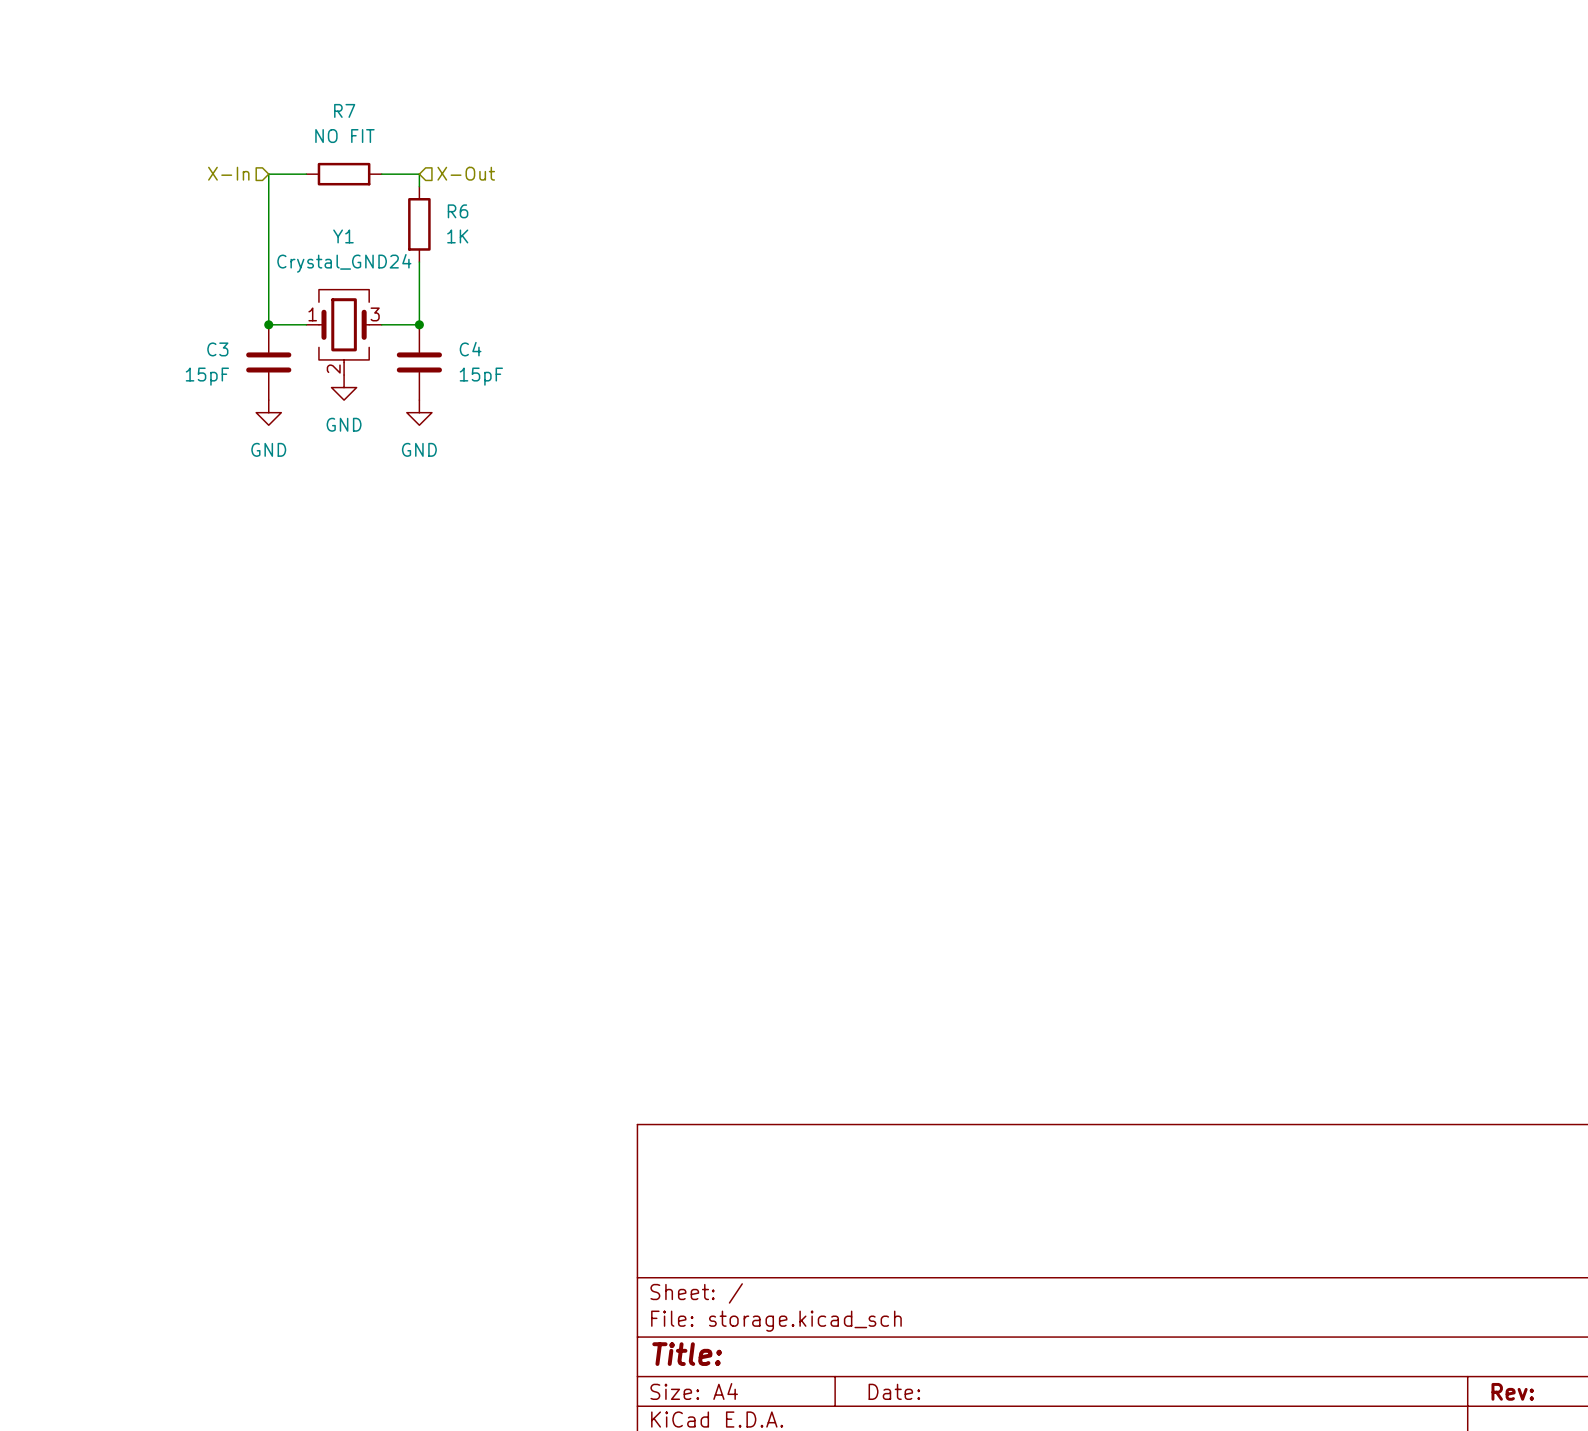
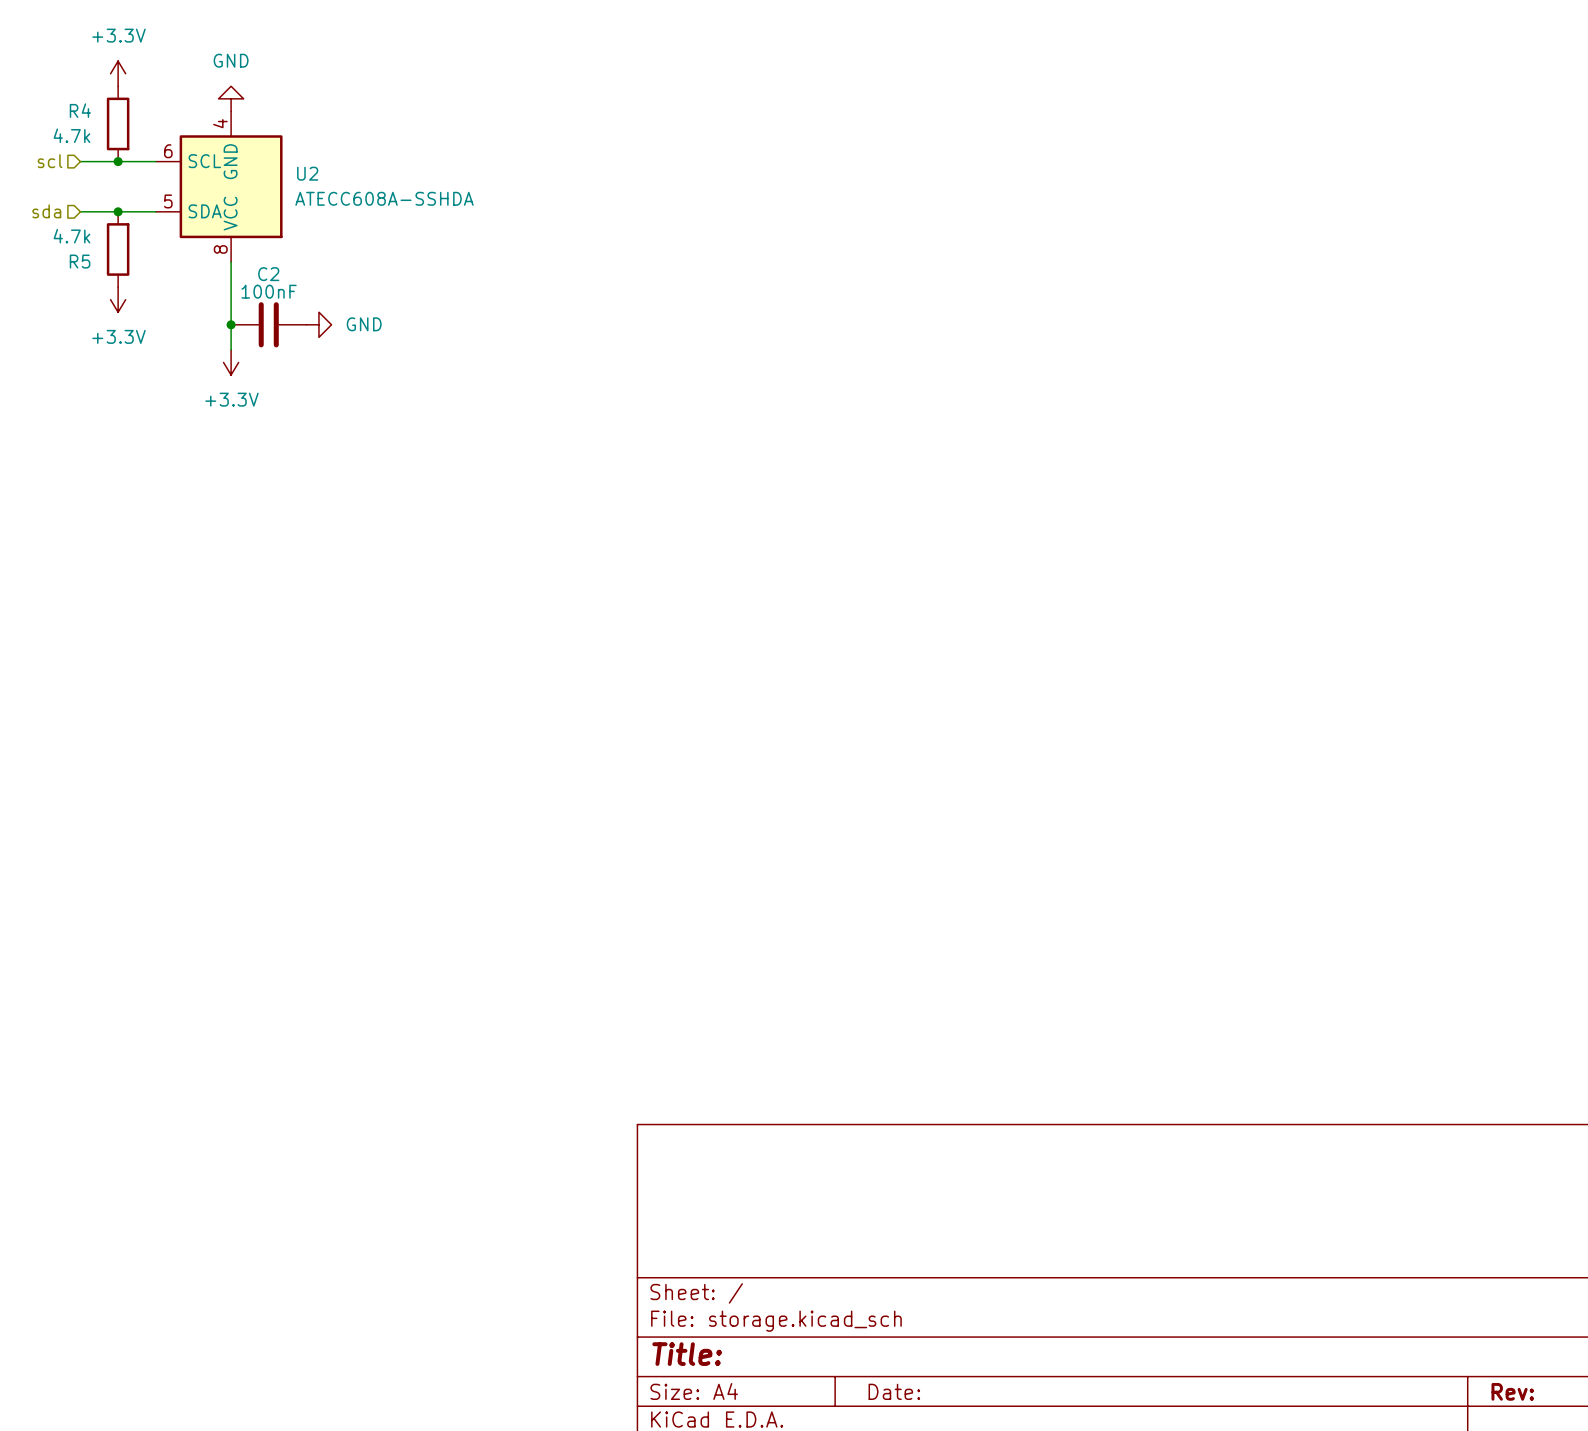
power symbol: none -> +3.3V (118, 73)
power symbol: none -> GND (231, 98)
R4: none -> 4.7k (118, 123)
hierarchical label: none -> scl (50, 161)
wire: none -> (80, 161) (155, 161)
junction: none -> (118, 161)
hierarchical label: X-In (228, 173) -> none
hierarchical label: X-Out (466, 173) -> none
wire: (306, 174) (268, 174) (268, 324) (306, 324) -> none
R7: NO FIT (344, 174) -> none
wire: (381, 174) (419, 174) (419, 186) -> none
U2: none -> ATECC608A-SSHDA (219, 186)
hierarchical label: none -> sda (46, 211)
wire: none -> (80, 211) (155, 211)
junction: none -> (118, 211)
R6: 1K (419, 224) -> none
R5: none -> 4.7k (118, 249)
wire: none -> (231, 262) (231, 349)
wire: (419, 262) (419, 324) (381, 324) -> none
power symbol: none -> +3.3V (118, 299)
junction position: (268, 324) -> (231, 324)
C2: none -> 100nF (268, 324)
power symbol: none -> GND (318, 324)
junction: (419, 324) -> none
Y1: Crystal_GND24 (344, 332) -> none
power symbol: none -> +3.3V (231, 362)
C3: 15pF (268, 362) -> none
C4: 15pF (419, 362) -> none
power symbol: GND (344, 387) -> none
power symbol: GND (268, 412) -> none
power symbol: GND (419, 412) -> none

